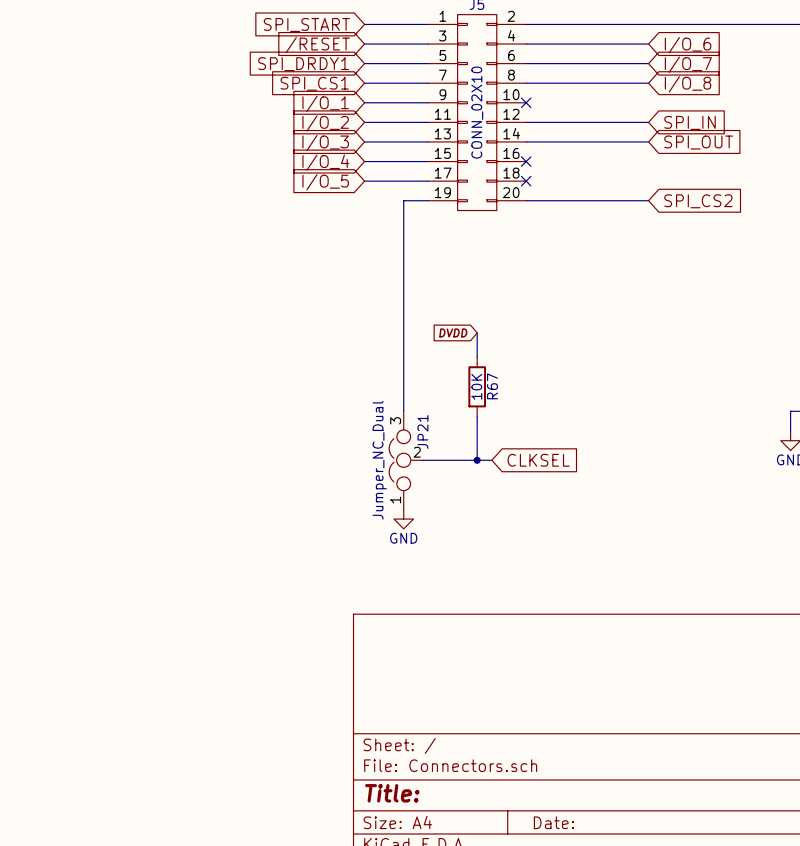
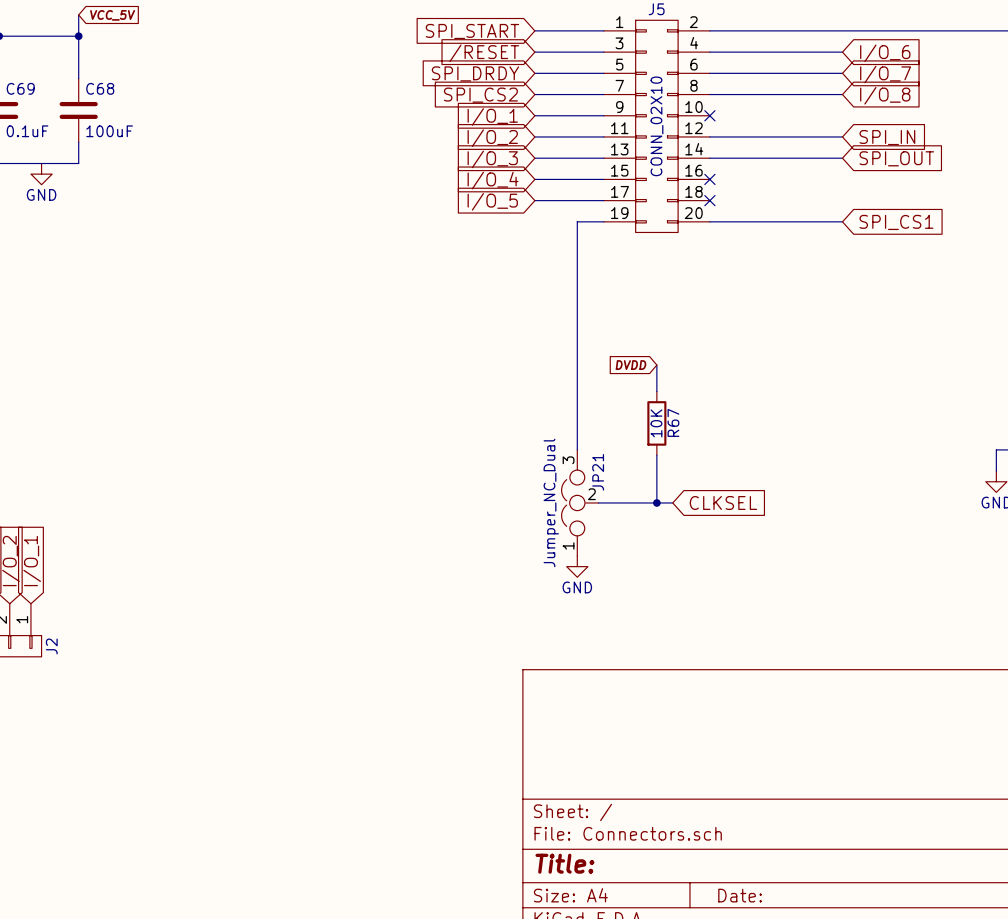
global label: SPI_DRDY1 (303, 64) -> SPI_DRDY (475, 73)
global label: SPI_CS1 (314, 83) -> SPI_CS2 (480, 95)
global label: SPI_CS2 (698, 201) -> SPI_CS1 (896, 222)

